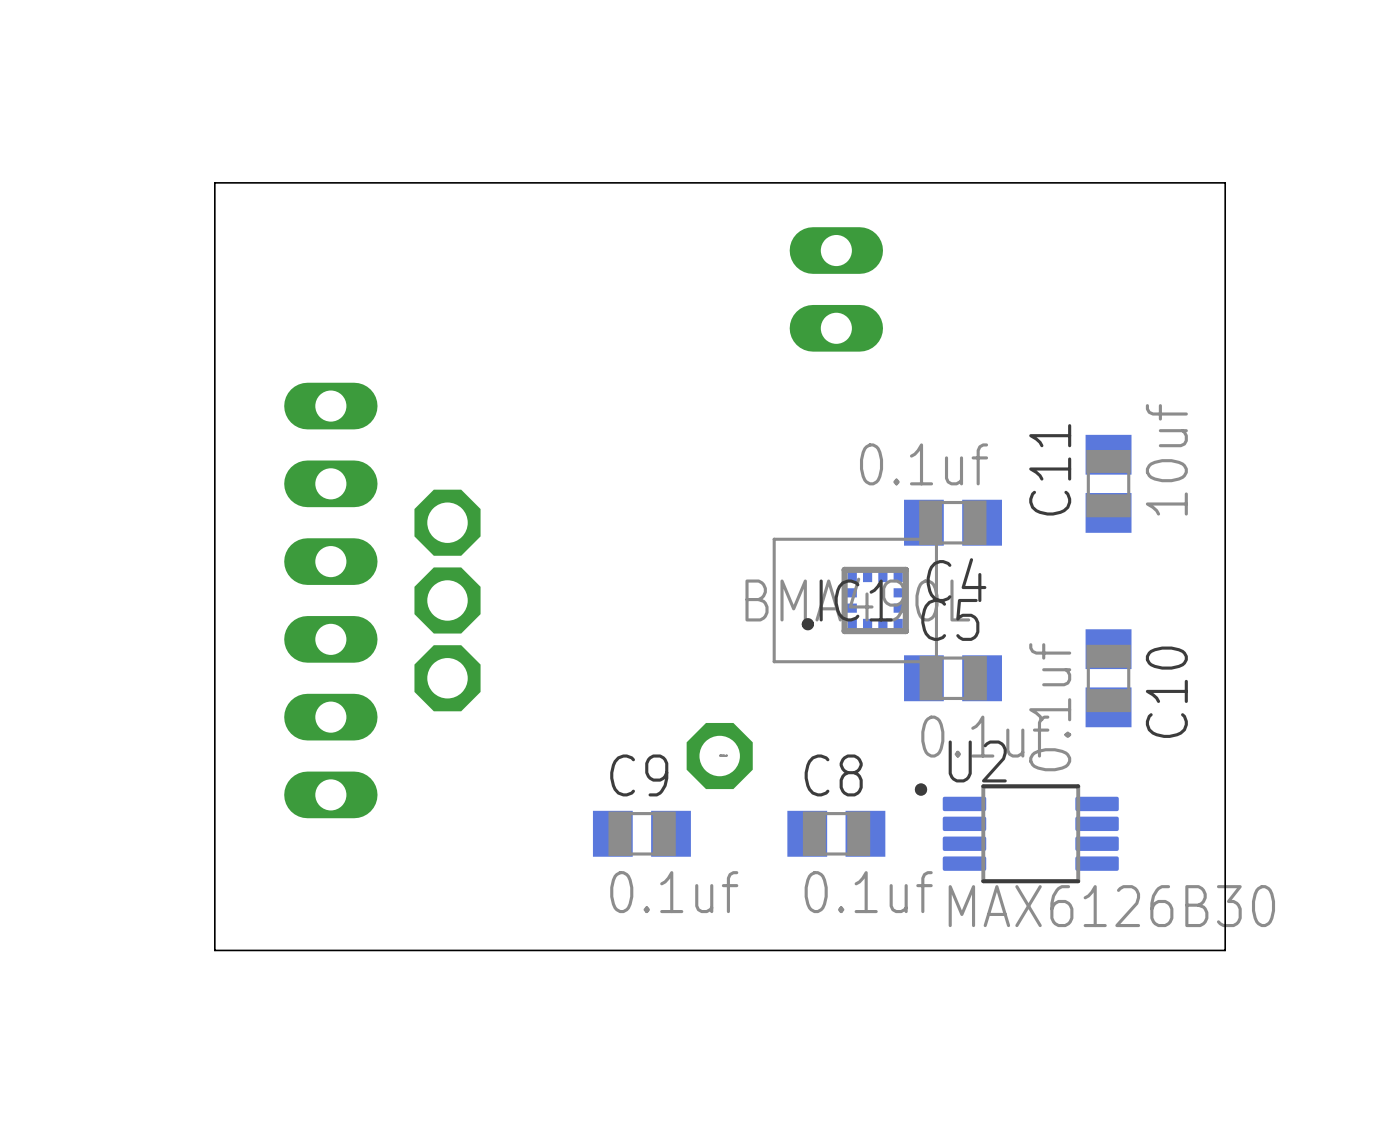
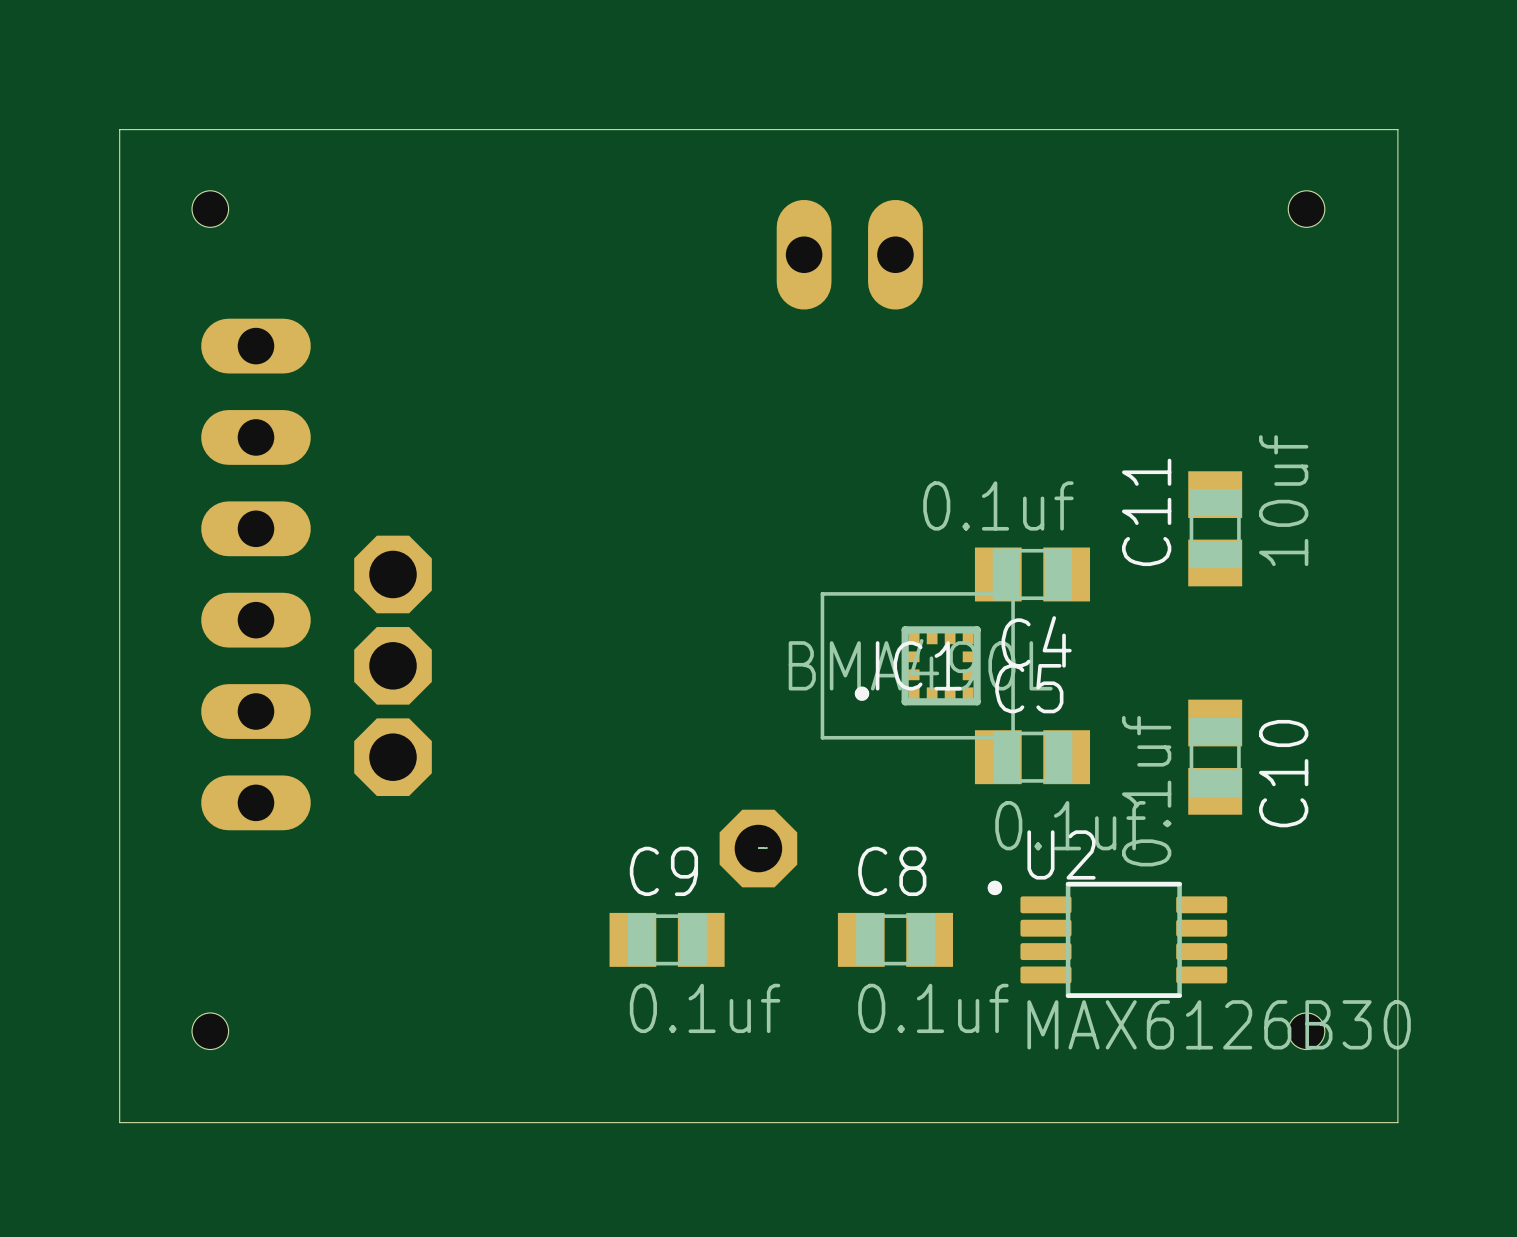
board edge: (1225, 182) (214, 182) (214, 950) (1225, 950) (1225, 182) -> (1397, 129) (1397, 1122) (119, 1122) (119, 129) (1397, 129)
hole: none -> (210, 209)
hole: none -> (1306, 209)
part rotation: 0° (836, 289) -> 90° clockwise (849, 254)
part position: (447, 522) -> (393, 574)
part position: (330, 600) -> (255, 574)
part position: (447, 600) -> (393, 665)
part position: (447, 678) -> (393, 757)
hole: none -> (210, 1031)
hole: none -> (1306, 1031)

